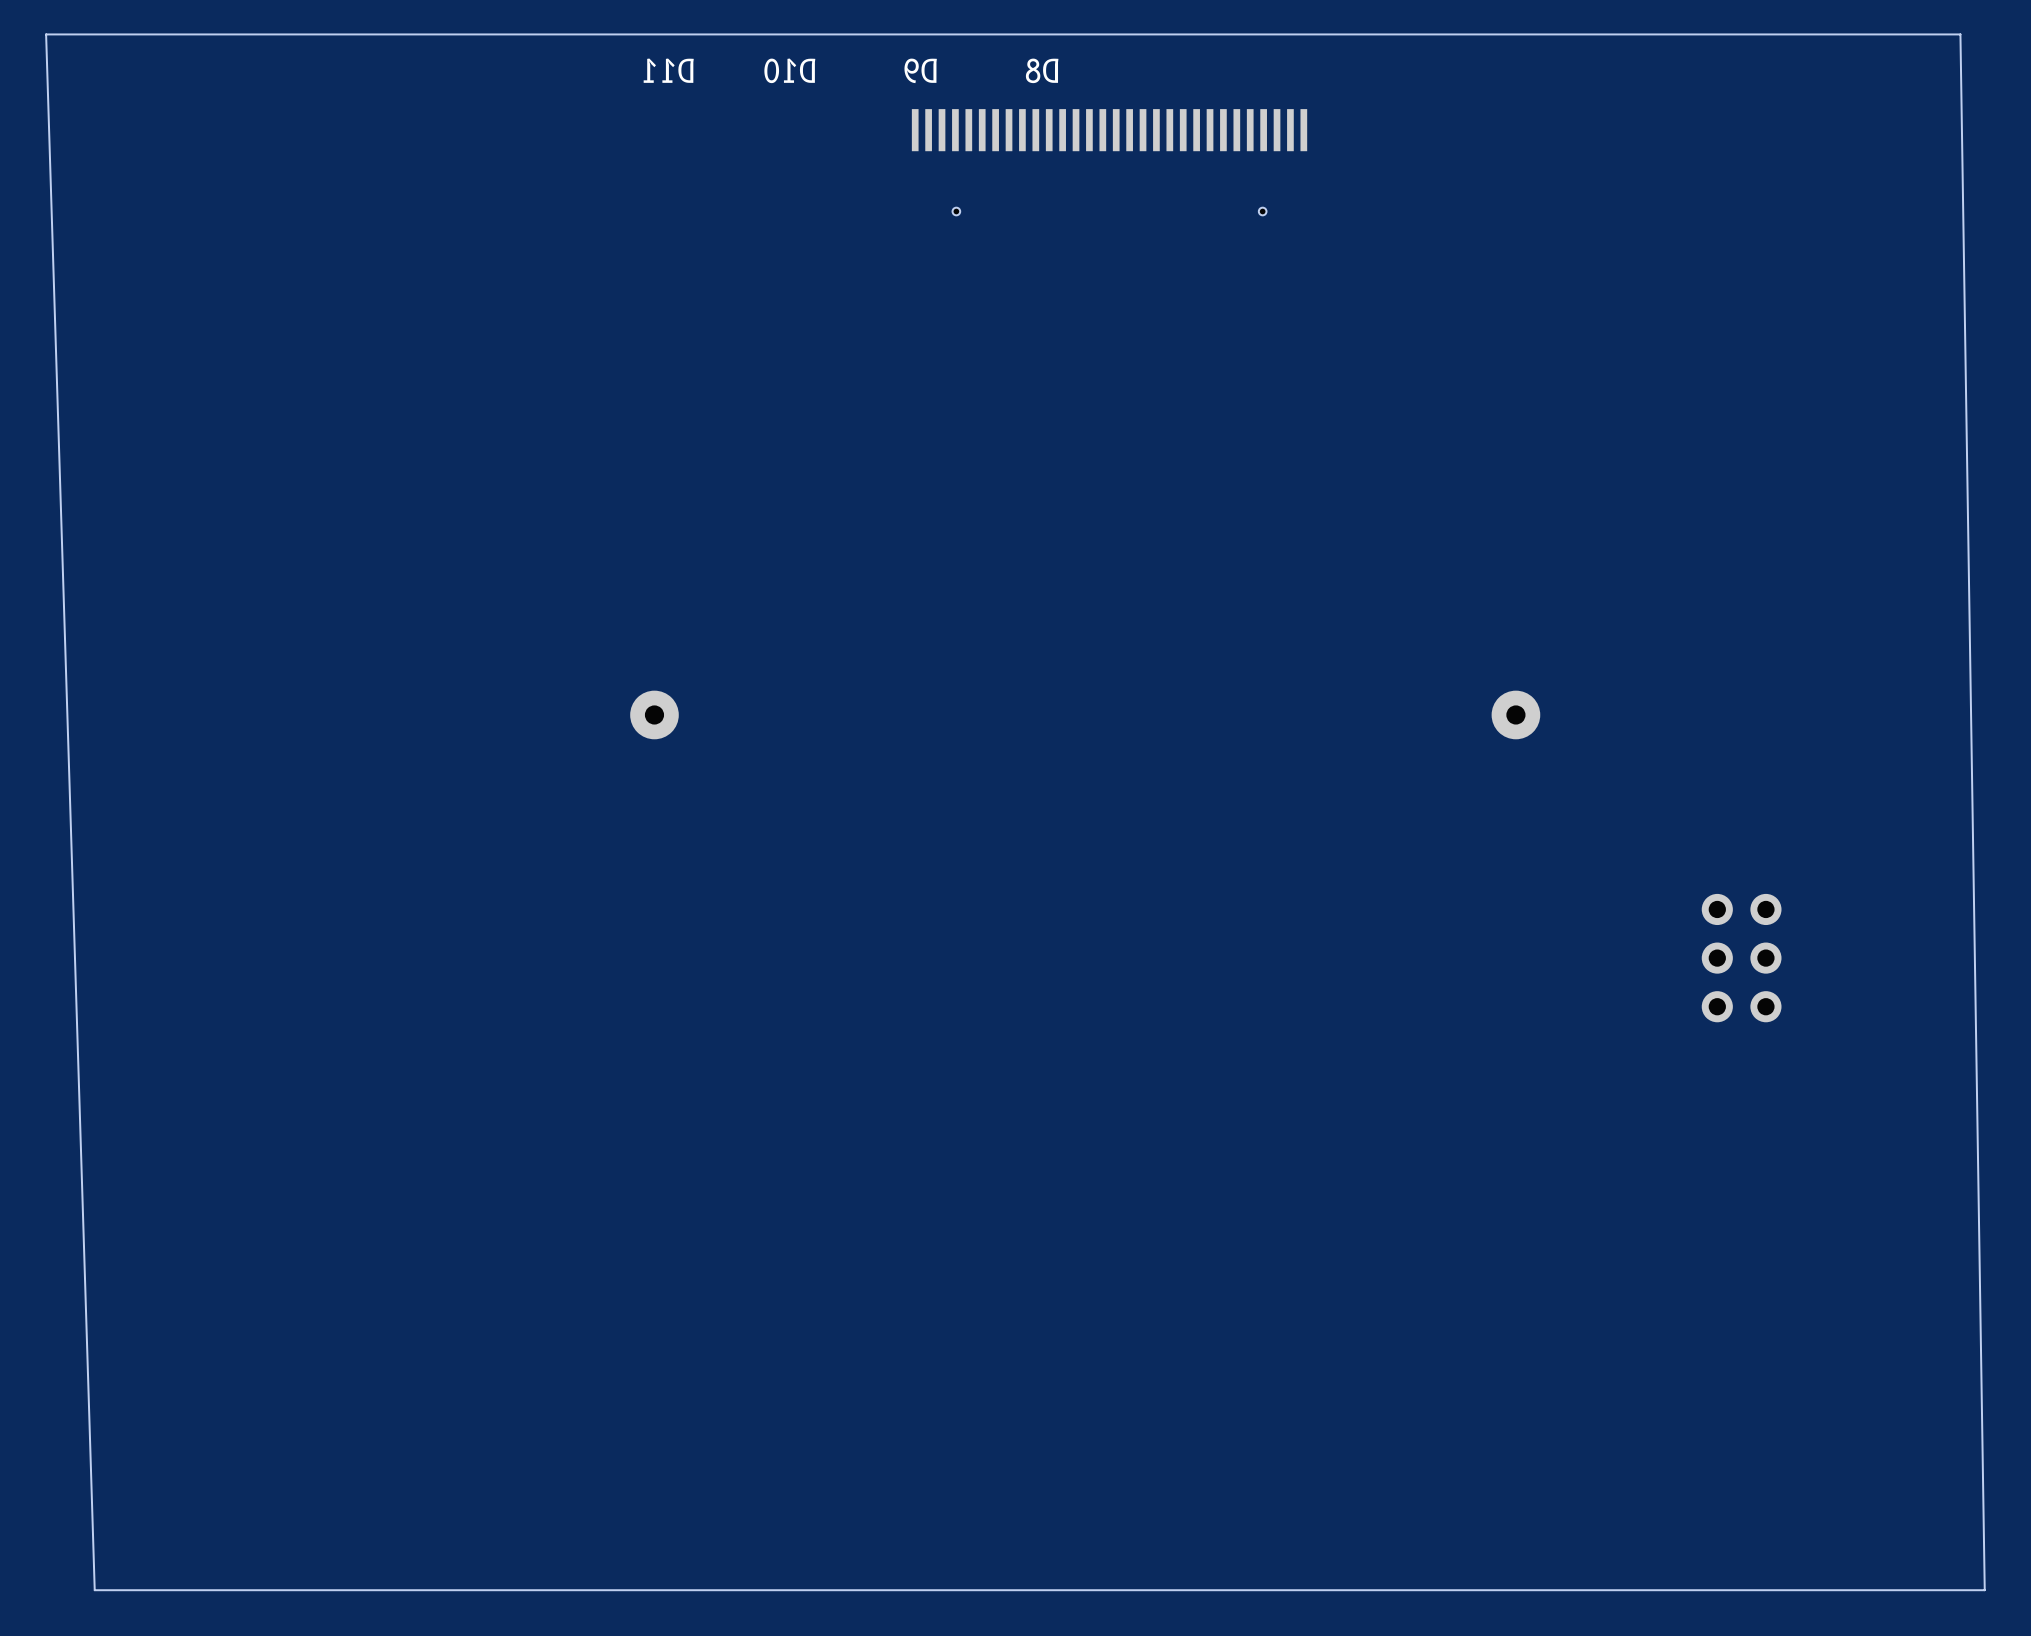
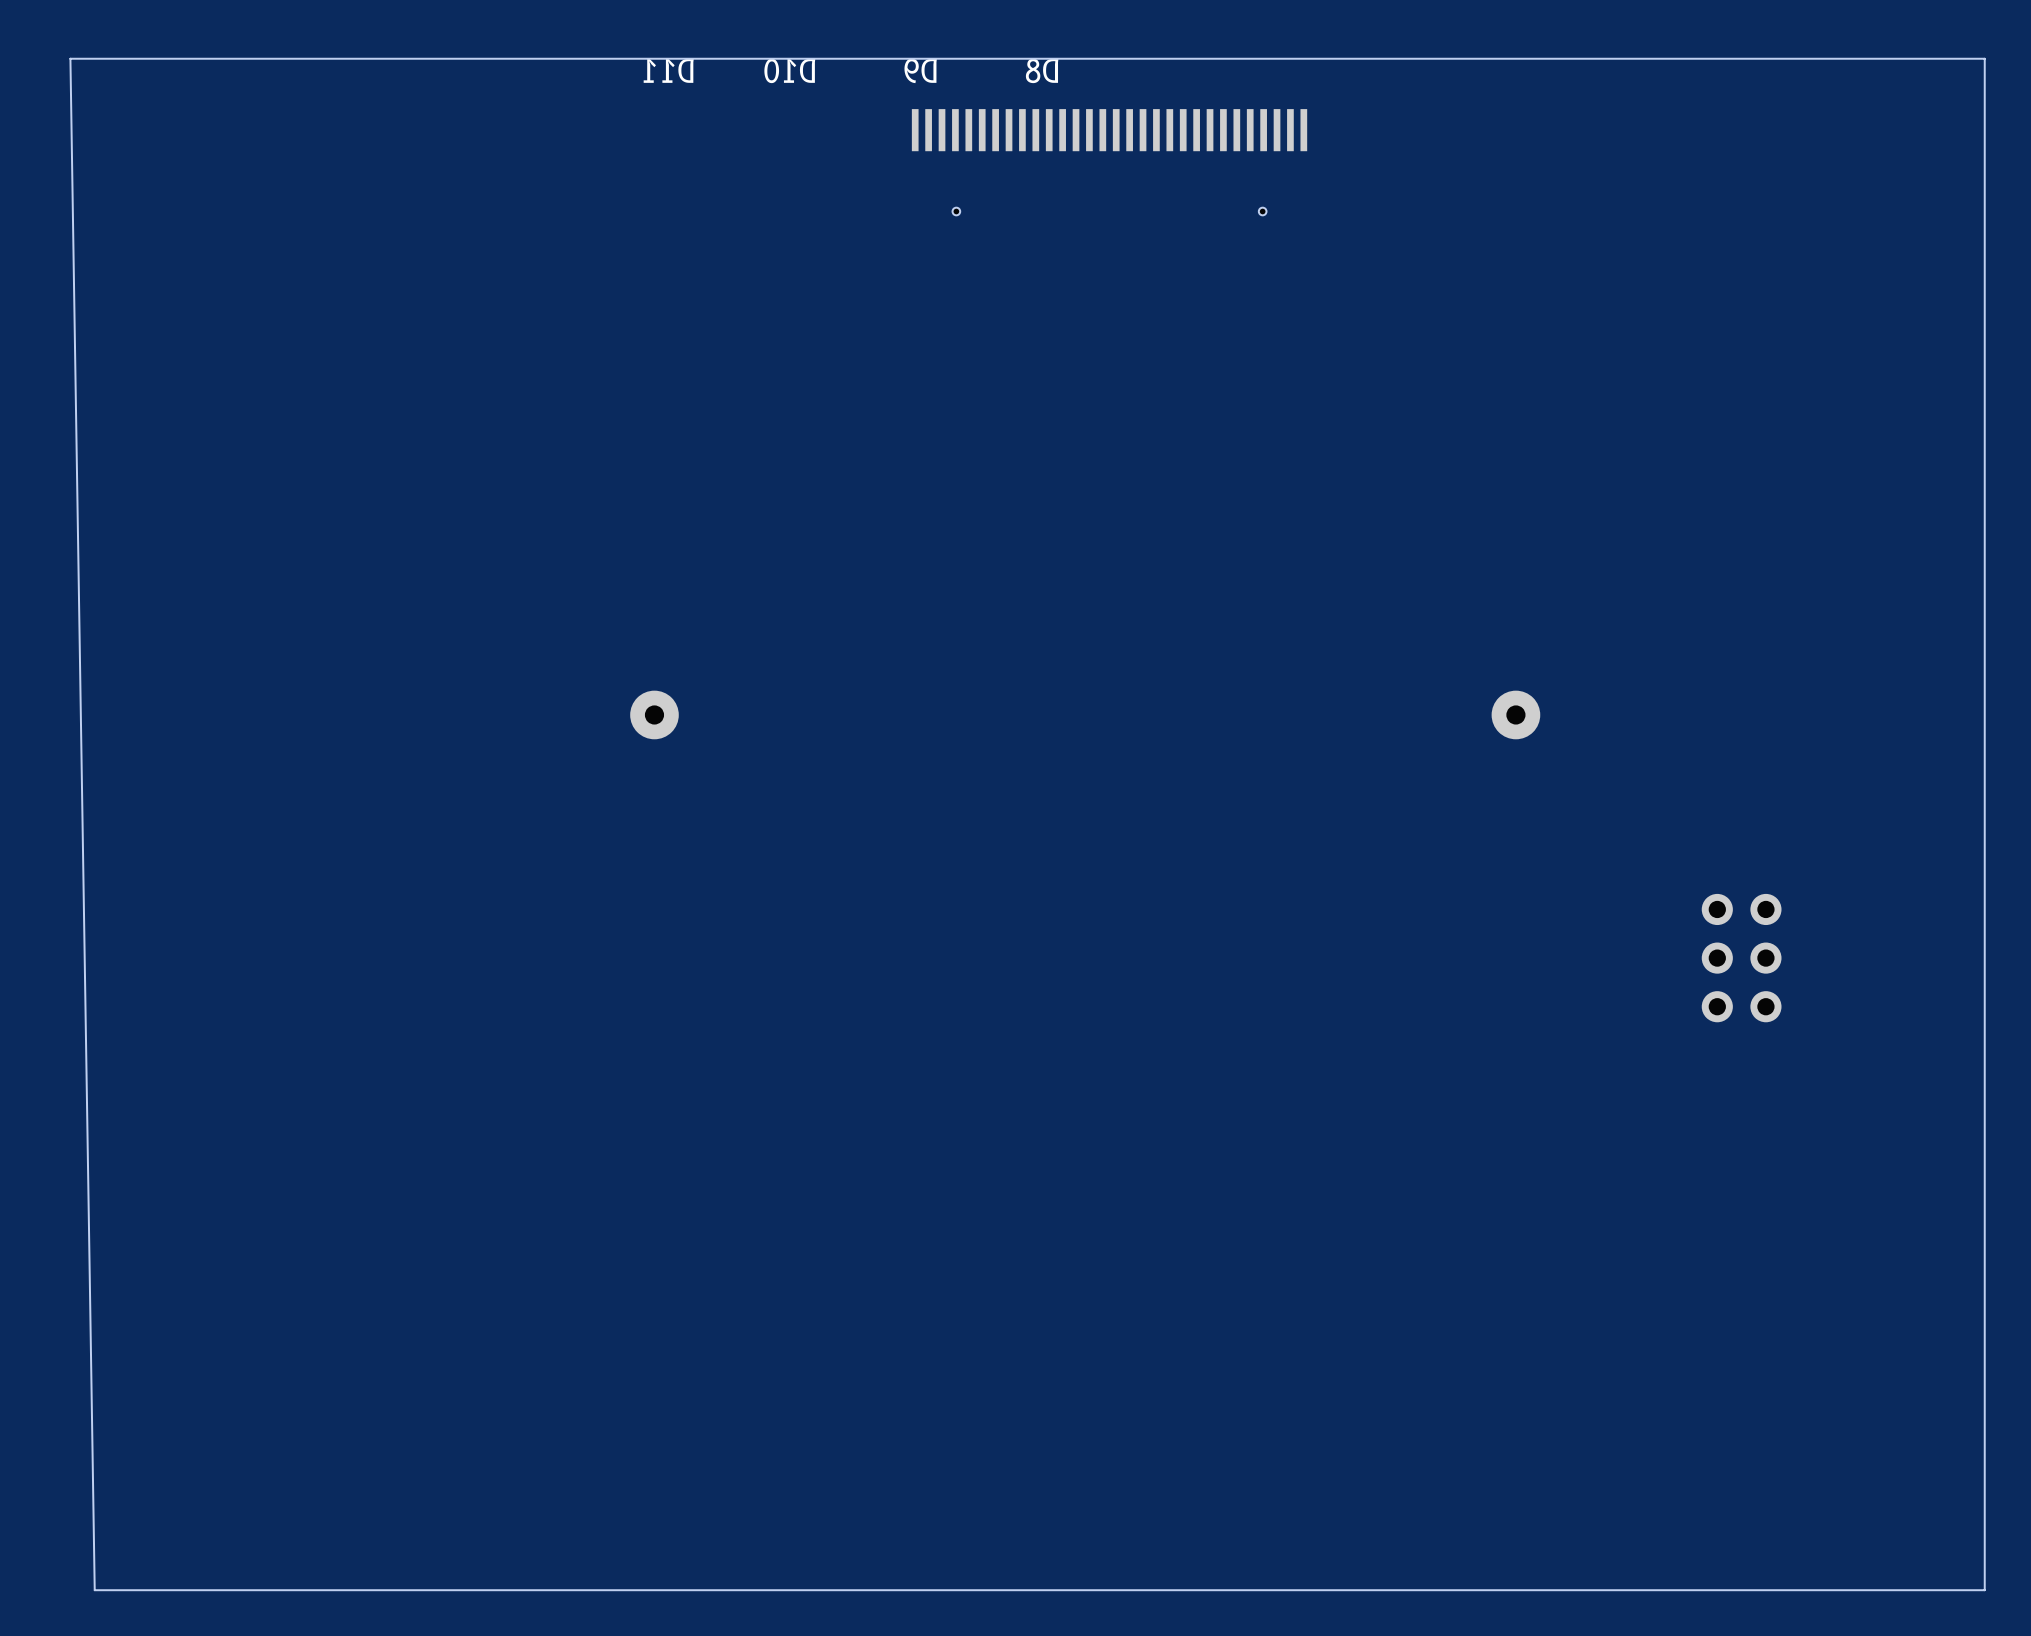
board edge: (1984, 1590) (1960, 34) (46, 34) (94, 1590) -> (1984, 1590) (1984, 58) (70, 58) (94, 1590)

